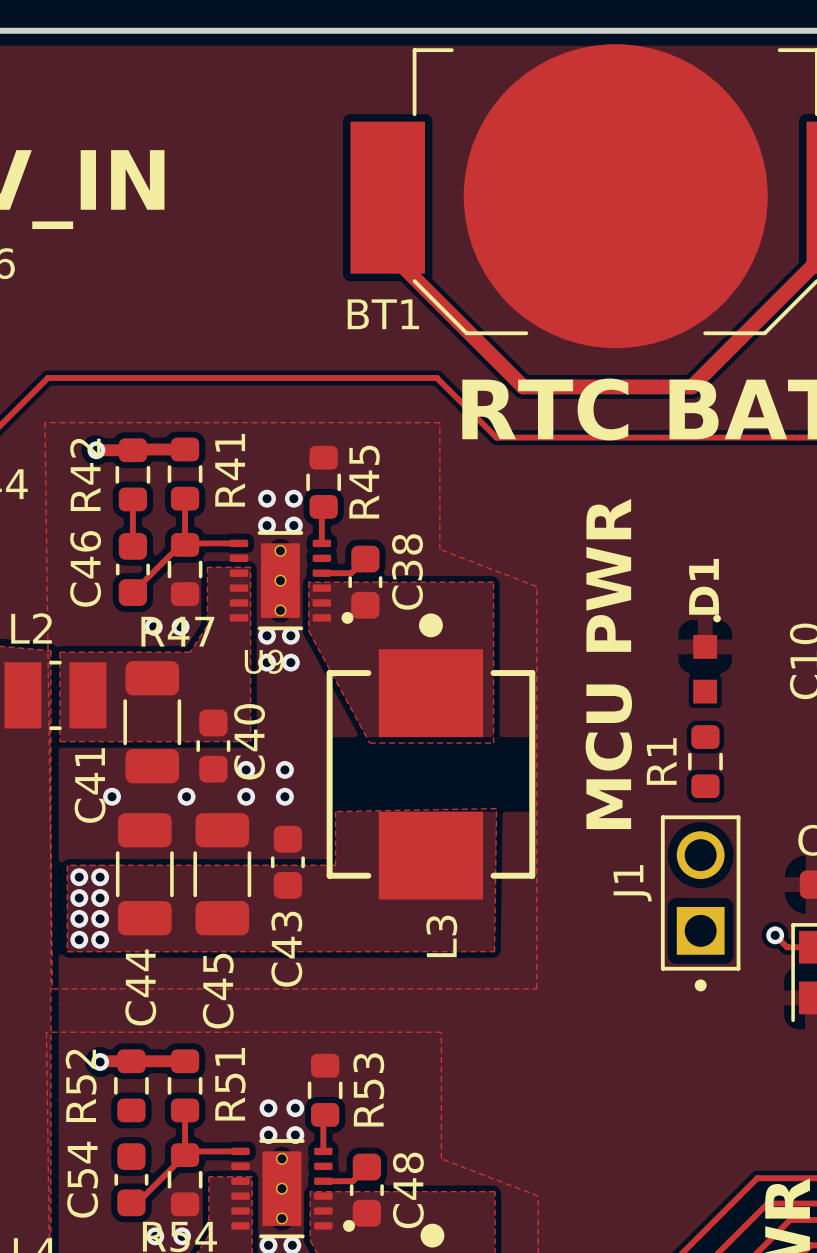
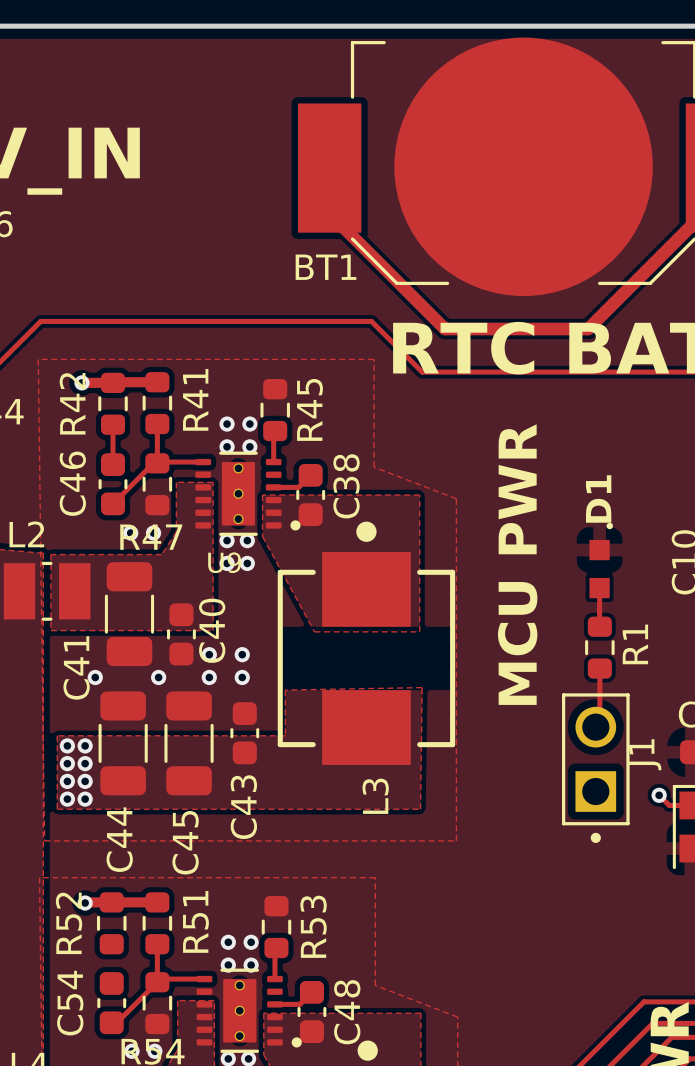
track: none -> (599, 588) (599, 626)
R1 name position: R1 (661, 761) -> R1 (635, 644)
track: none -> (599, 668) (599, 723) (595, 727)
J1 name position: J1 (632, 883) -> J1 (645, 754)

